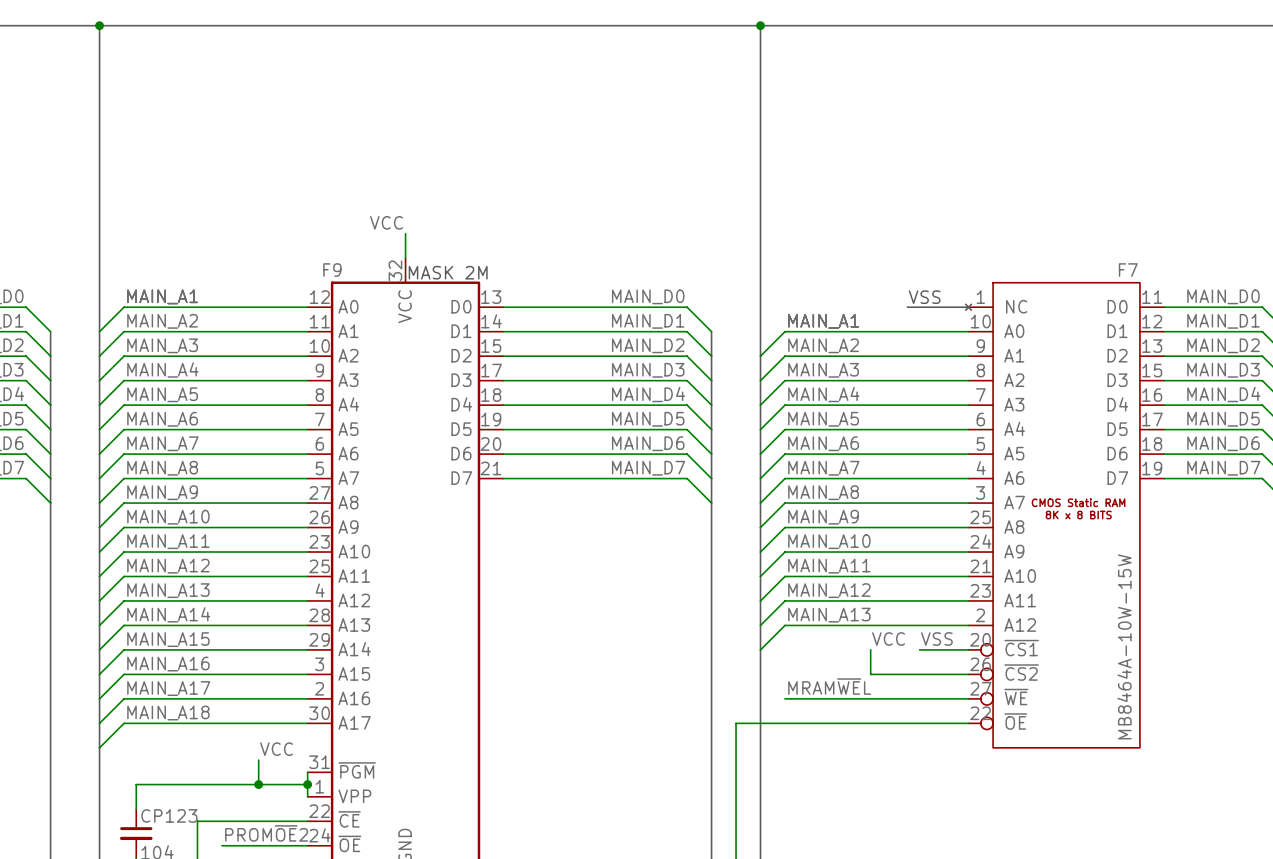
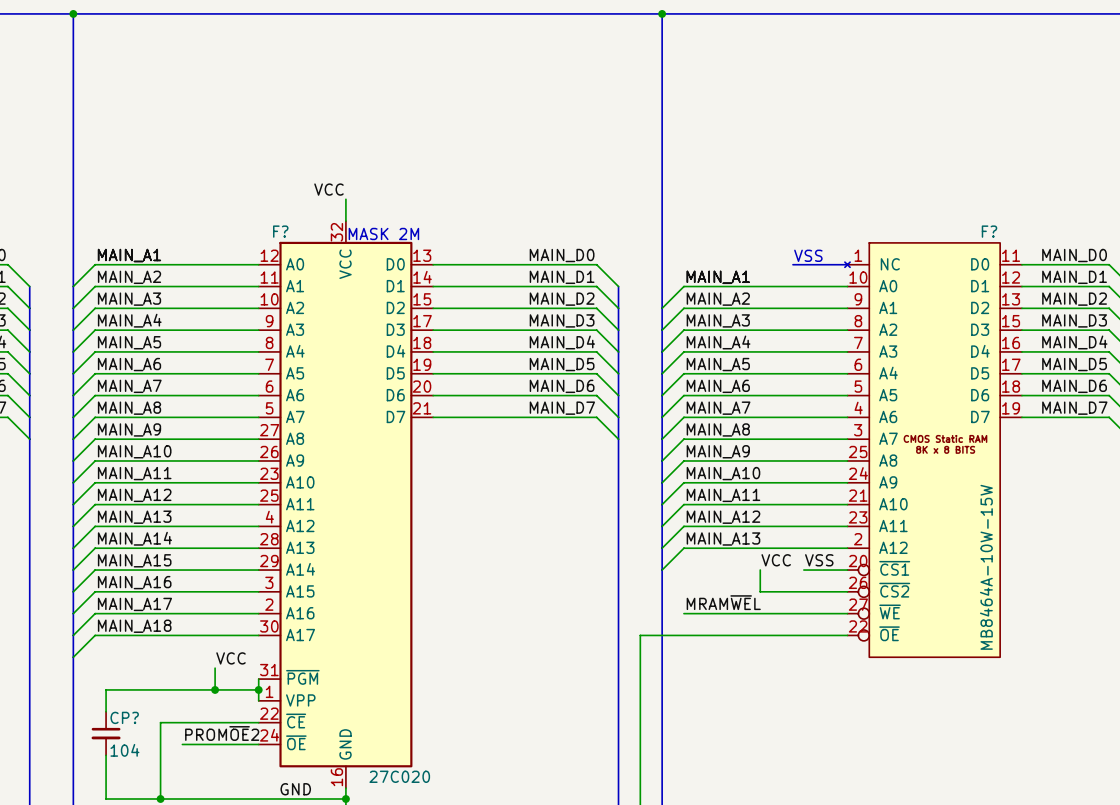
F9 name: F9 (332, 270) -> F? (280, 231)
F7 name: F7 (1128, 270) -> F? (989, 231)
CP123 name: CP123 (169, 815) -> CP? (124, 717)

